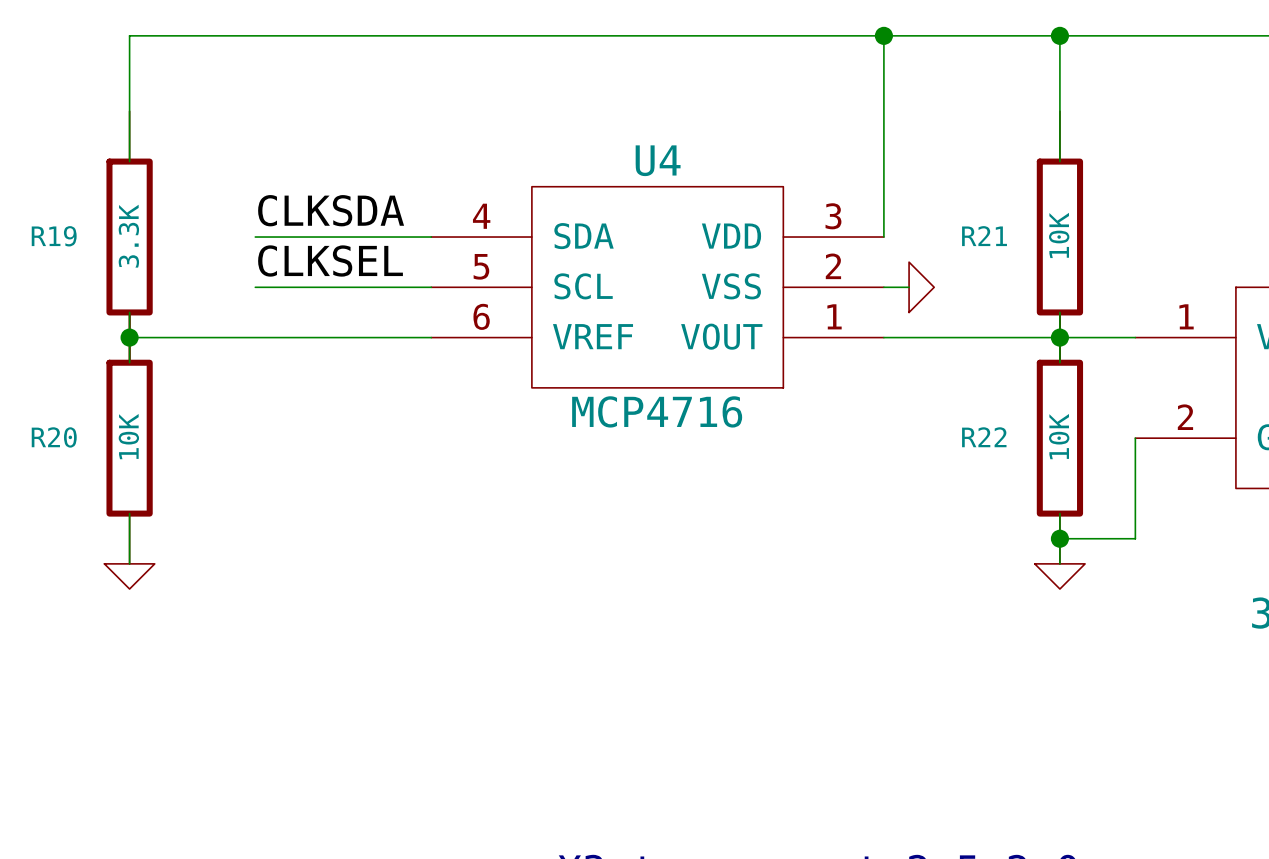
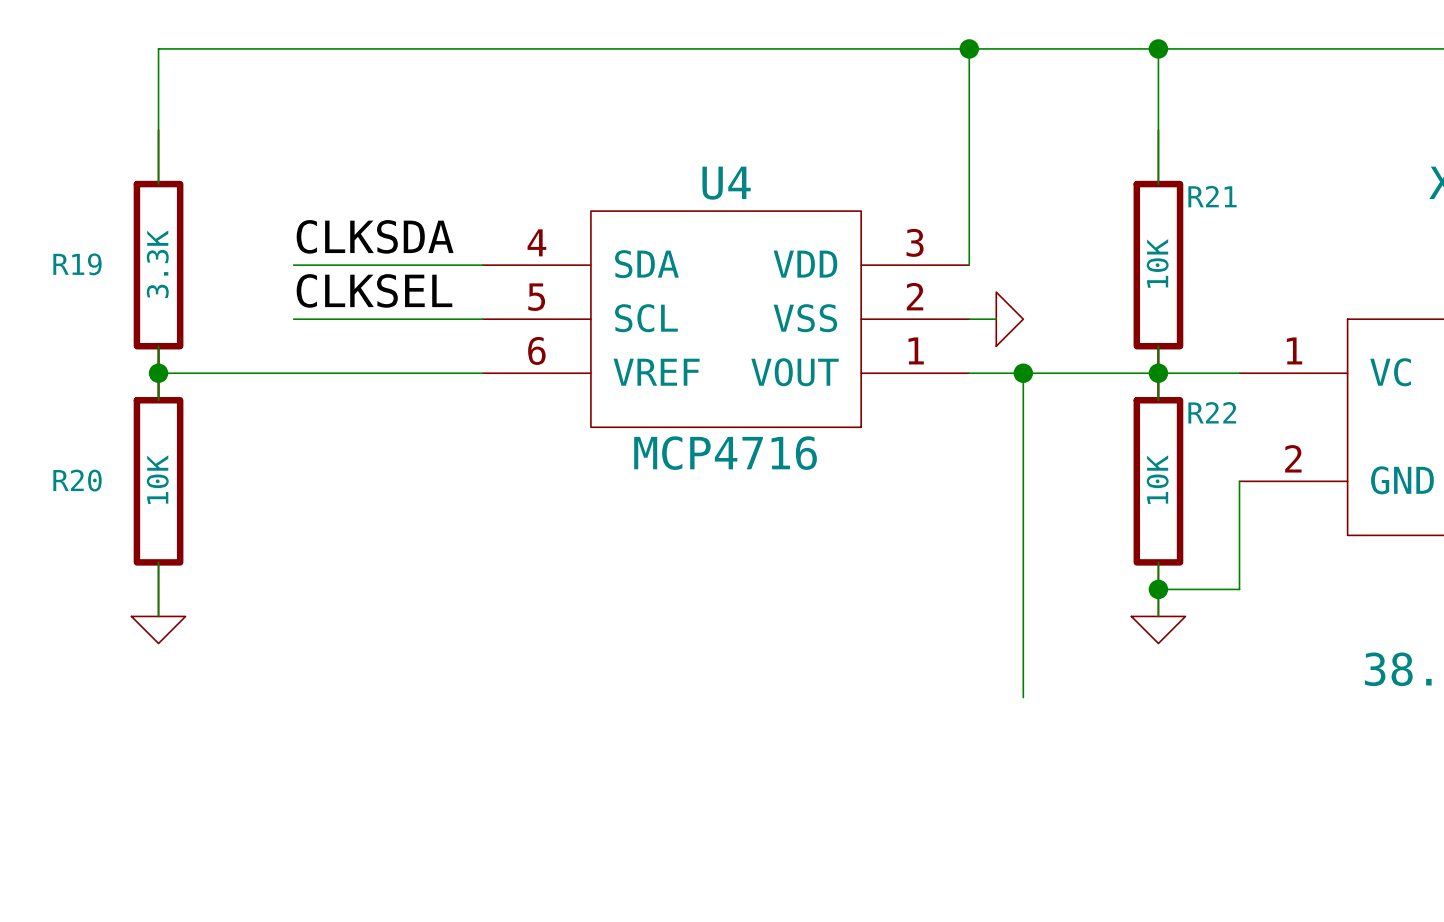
R21 name position: R21 (984, 236) -> R21 (1212, 196)
wire: none -> (1023, 373) (1023, 697)
junction: none -> (1023, 373)
R22 name position: R22 (984, 437) -> R22 (1212, 412)

